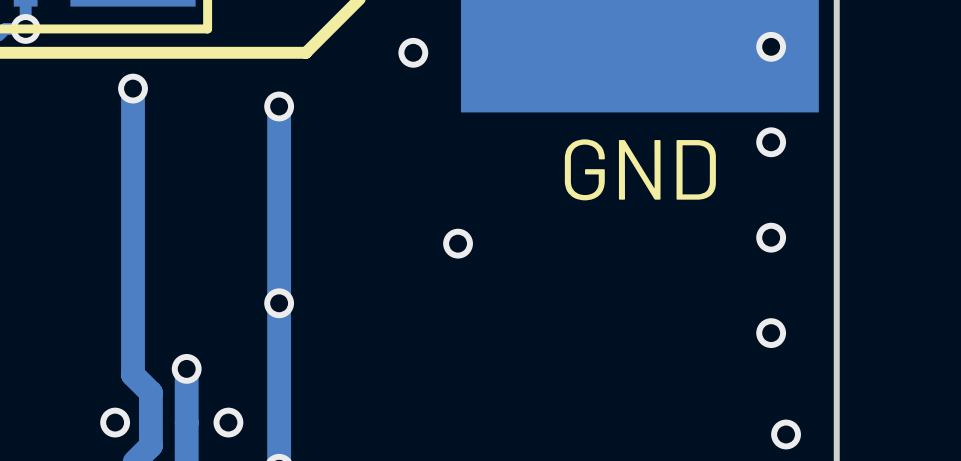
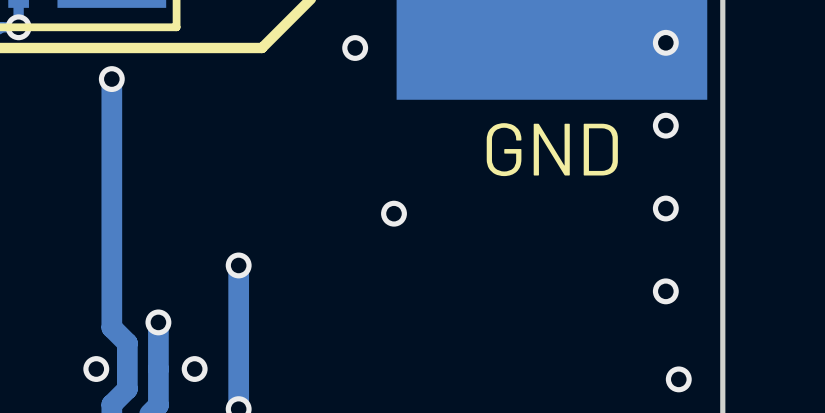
track: (279, 106) (279, 303) -> none
via: (279, 106) -> none

